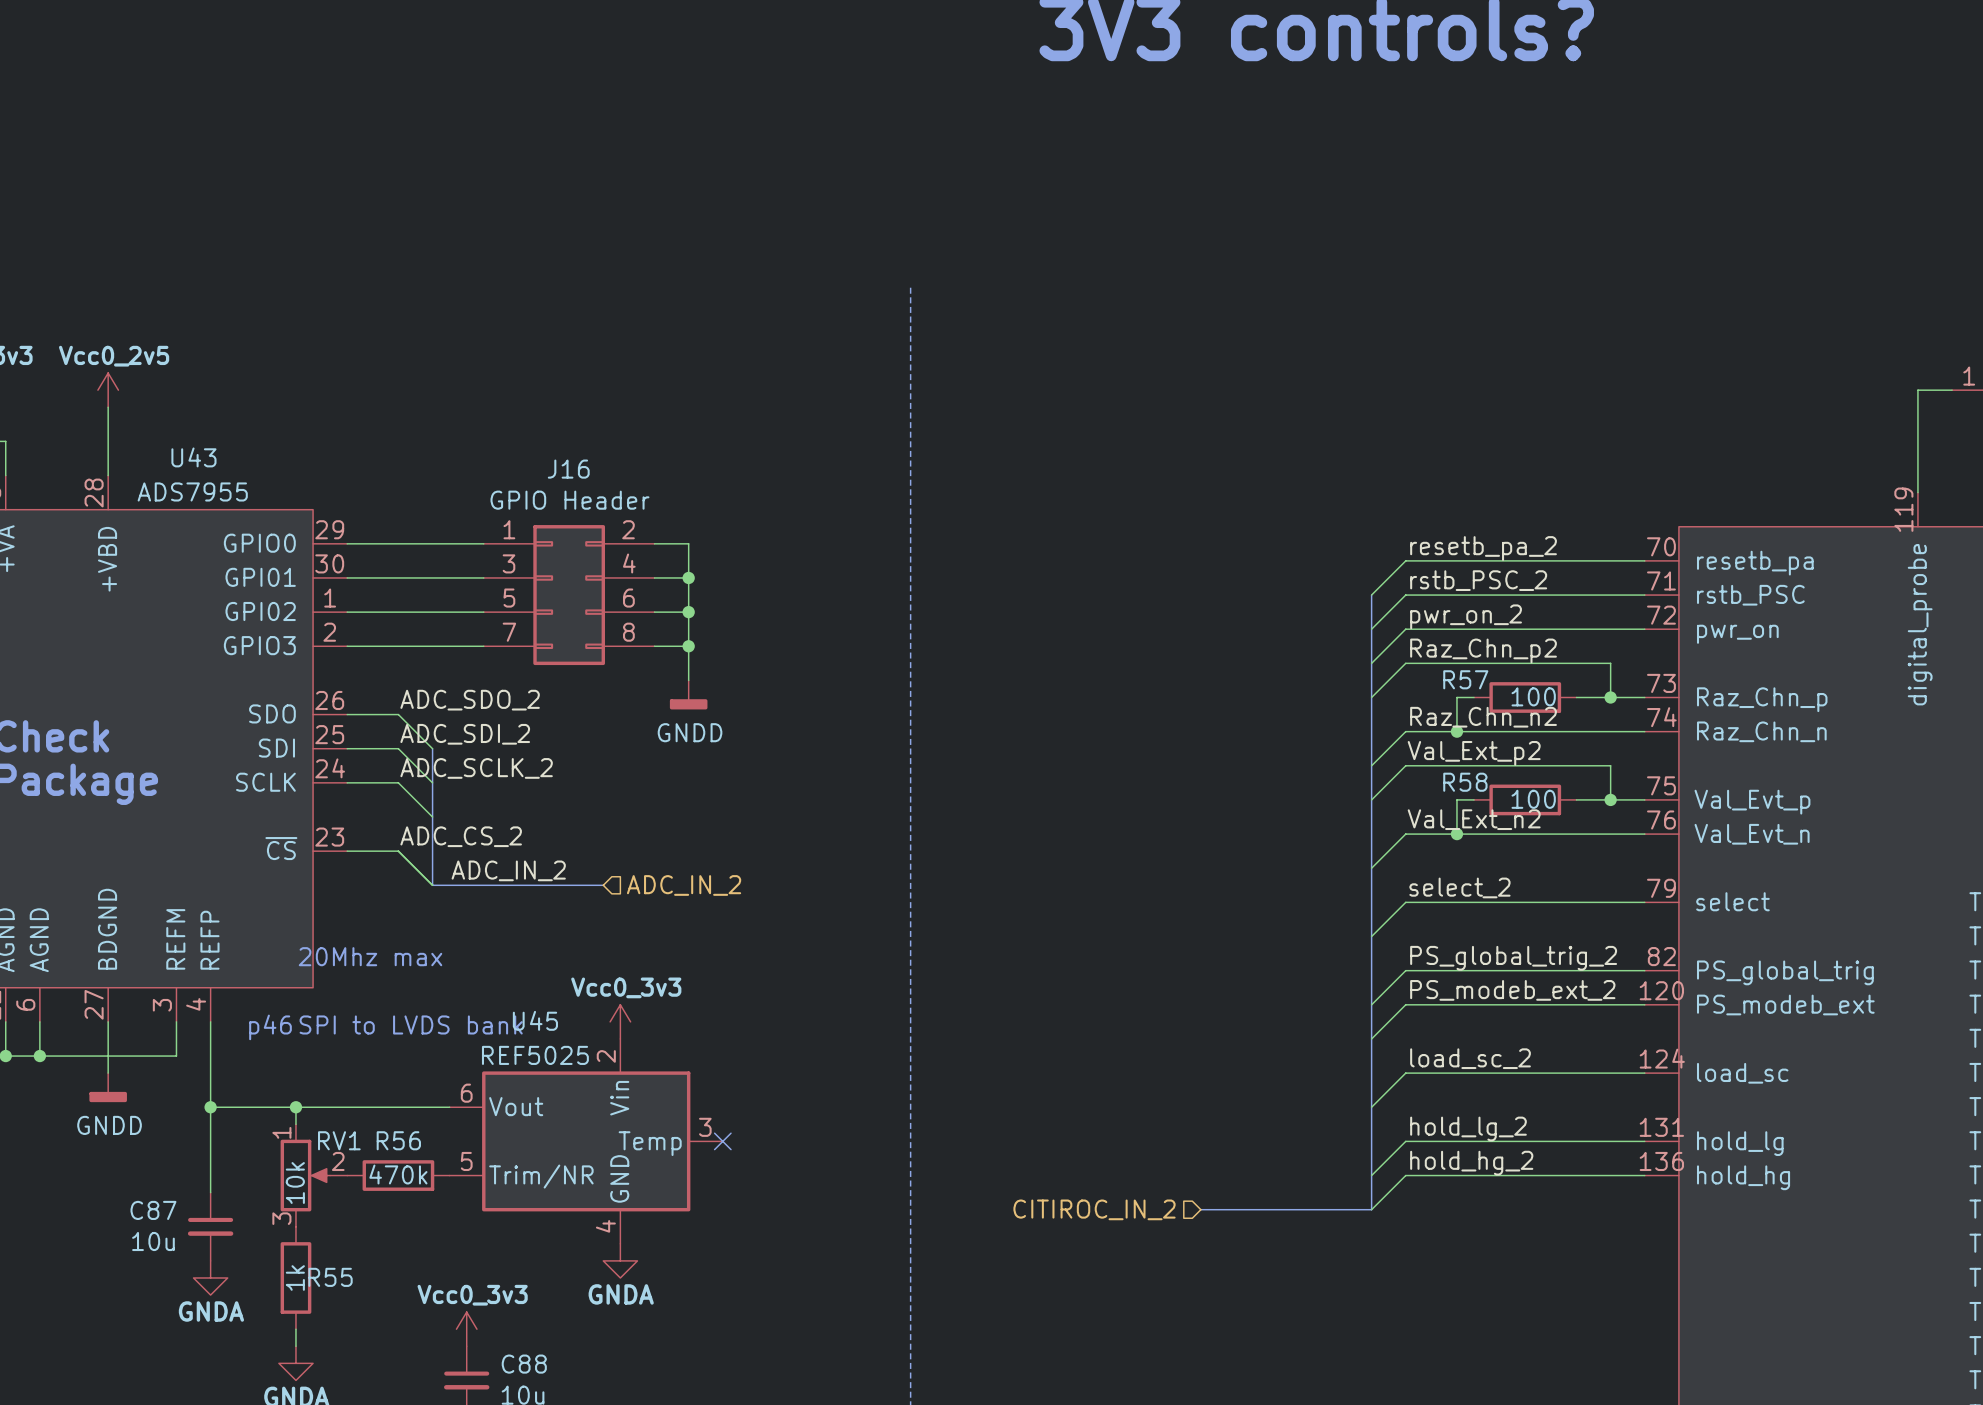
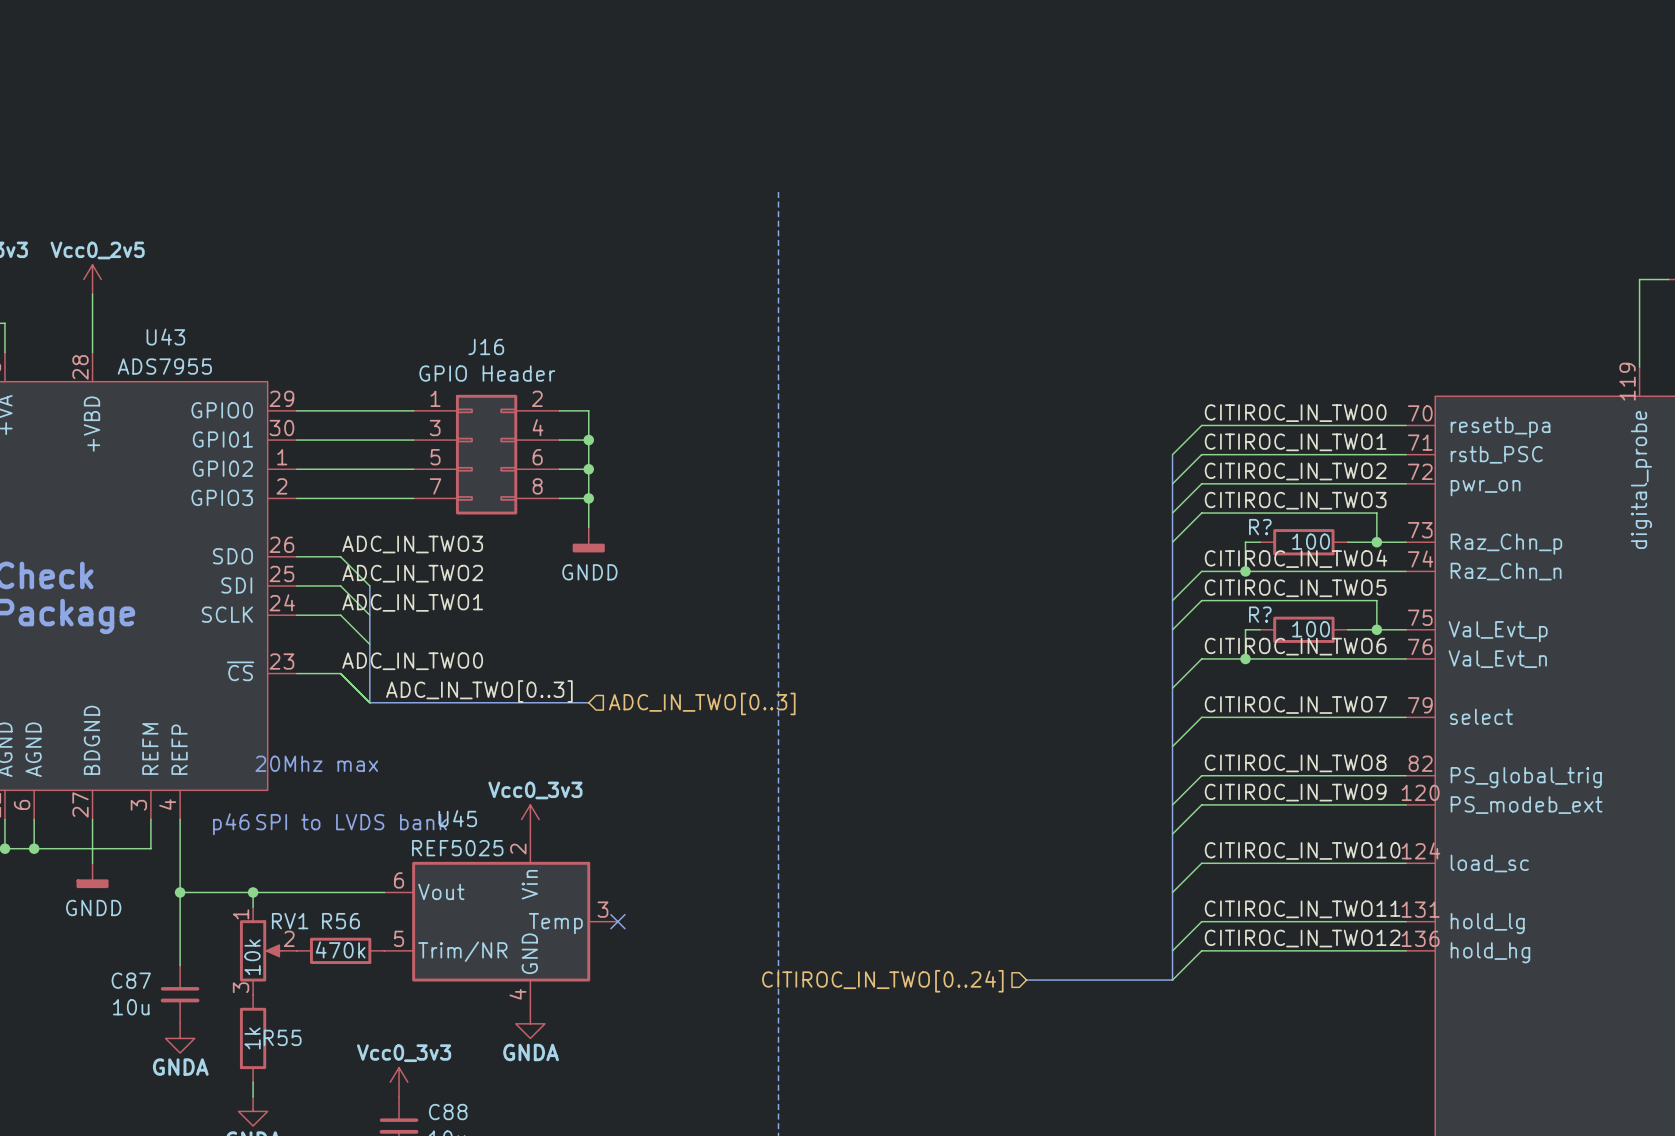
label: resetb_pa_2 (1483, 548) -> CITIROC_IN_TWO0 (1295, 413)
label: rstb_PSC_2 (1478, 580) -> CITIROC_IN_TWO1 (1295, 442)
label: pwr_on_2 (1466, 616) -> CITIROC_IN_TWO2 (1295, 471)
label: Raz_Chn_p2 (1483, 650) -> CITIROC_IN_TWO3 (1295, 500)
R57 name: R57 (1465, 679) -> R? (1260, 527)
label: ADC_SDO_2 (470, 700) -> ADC_IN_TWO3 (412, 544)
label: Raz_Chn_n2 (1483, 717) -> CITIROC_IN_TWO4 (1296, 558)
label: ADC_SDI_2 (465, 734) -> ADC_IN_TWO2 (412, 573)
label: Val_Ext_p2 (1474, 753) -> CITIROC_IN_TWO5 (1295, 588)
label: ADC_SCLK_2 (476, 768) -> ADC_IN_TWO1 (412, 602)
R58 name: R58 (1465, 782) -> R? (1260, 614)
label: Val_Ext_n2 (1474, 819) -> CITIROC_IN_TWO6 (1295, 646)
label: ADC_CS_2 (461, 836) -> ADC_IN_TWO0 (412, 661)
label: ADC_IN_2 (508, 870) -> ADC_IN_TWO[0..3] (479, 691)
bus: none -> (515, 702) (588, 702)
hierarchical label: ADC_IN_2 (684, 885) -> none
hierarchical label: none -> ADC_IN_TWO[0..3] (702, 703)
label: select_2 (1459, 887) -> CITIROC_IN_TWO7 (1296, 705)
label: PS_global_trig_2 (1513, 958) -> CITIROC_IN_TWO8 (1295, 763)
label: PS_modeb_ext_2 (1512, 990) -> CITIROC_IN_TWO9 (1295, 792)
label: load_sc_2 (1470, 1058) -> CITIROC_IN_TWO10 (1302, 850)
label: hold_lg_2 (1468, 1129) -> CITIROC_IN_TWO11 (1302, 909)
label: hold_hg_2 (1471, 1163) -> CITIROC_IN_TWO12 (1302, 938)
hierarchical label: CITIROC_IN_2 (1094, 1209) -> CITIROC_IN_TWO[0..24] (882, 981)

